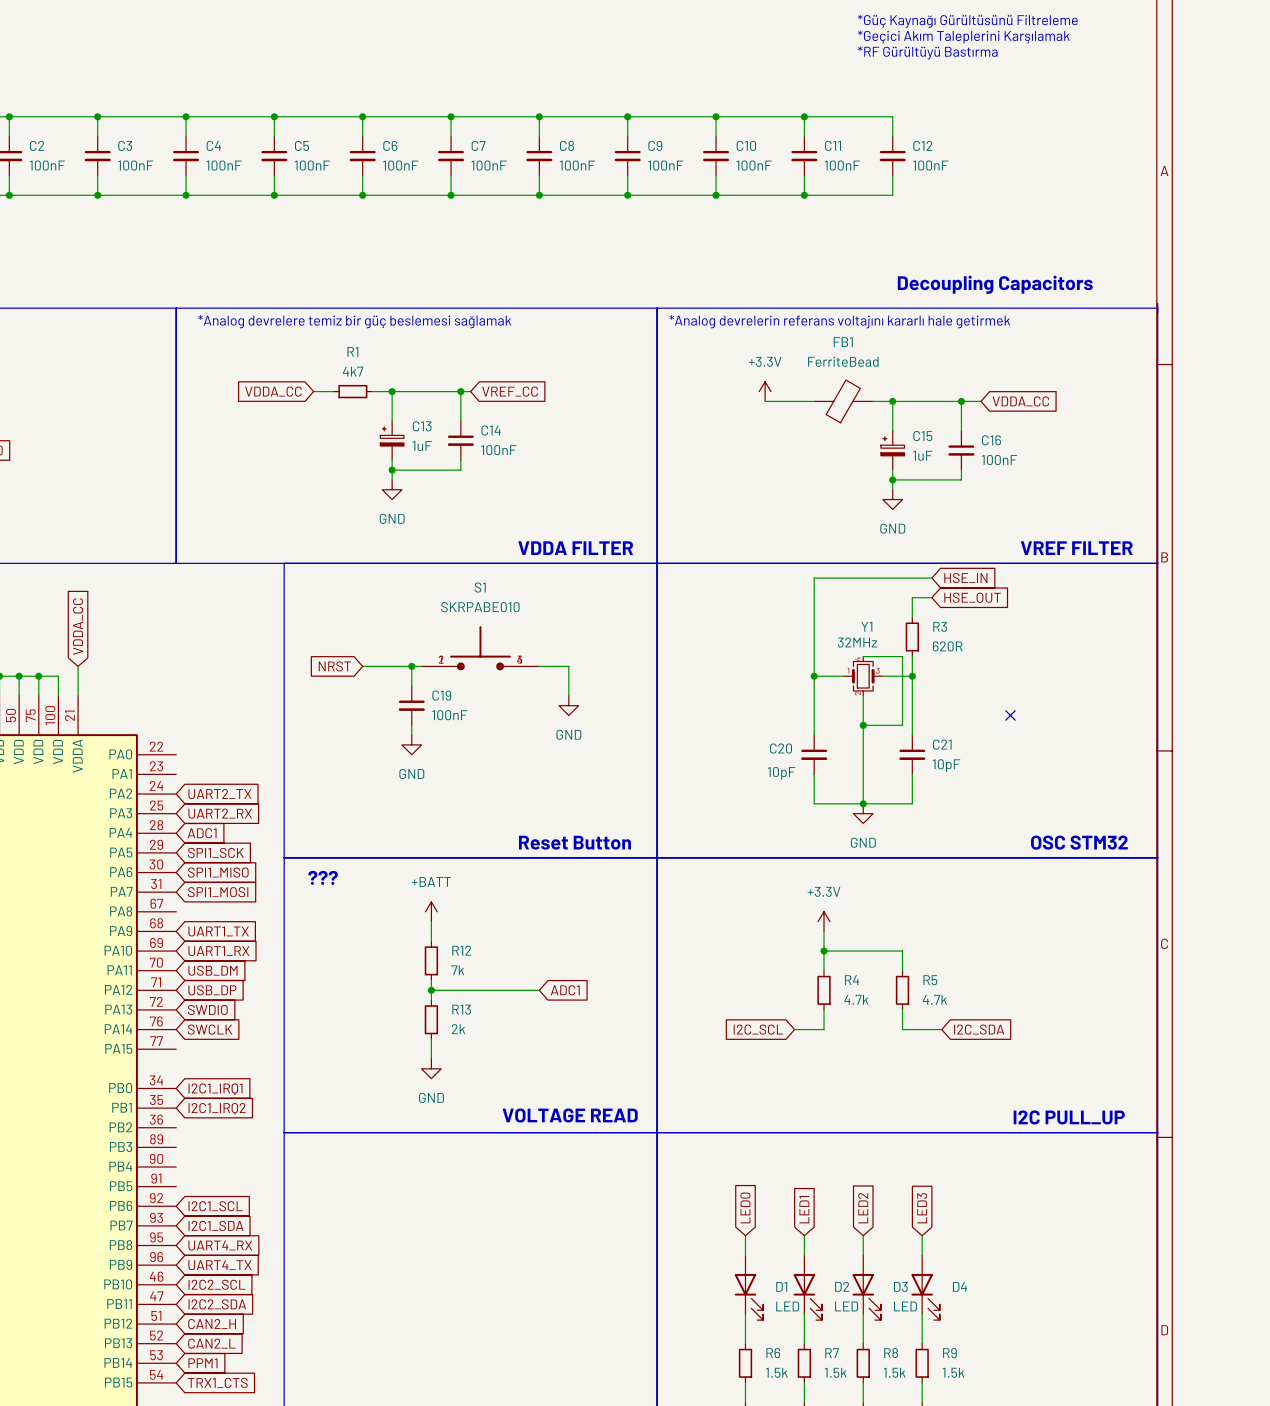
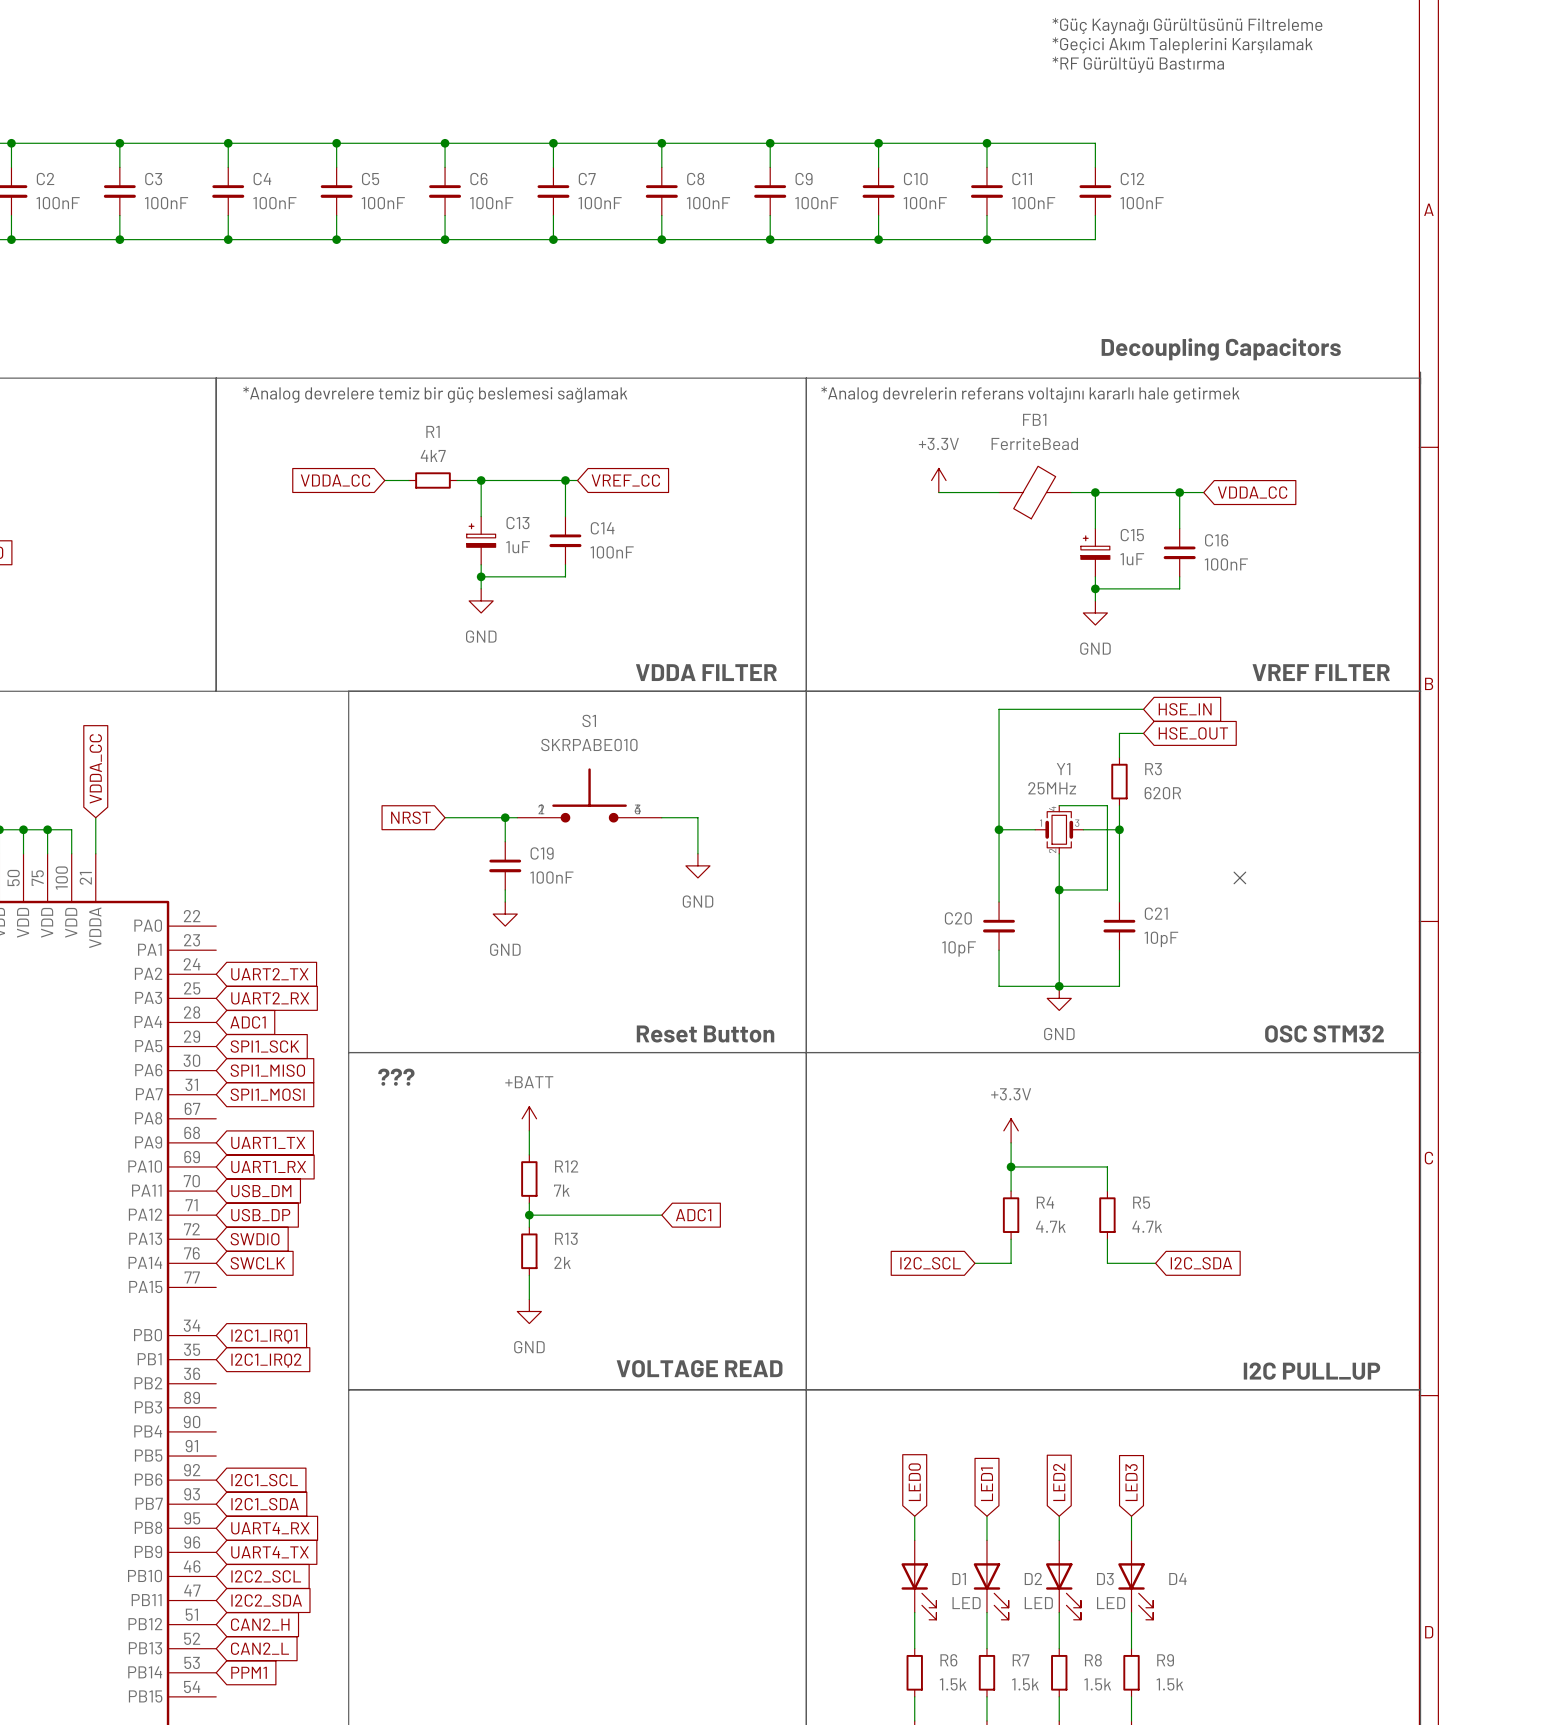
Y1 value: 32MHz (857, 642) -> 25MHz (1052, 788)
global label: TRX1_CTS (217, 1382) -> none

